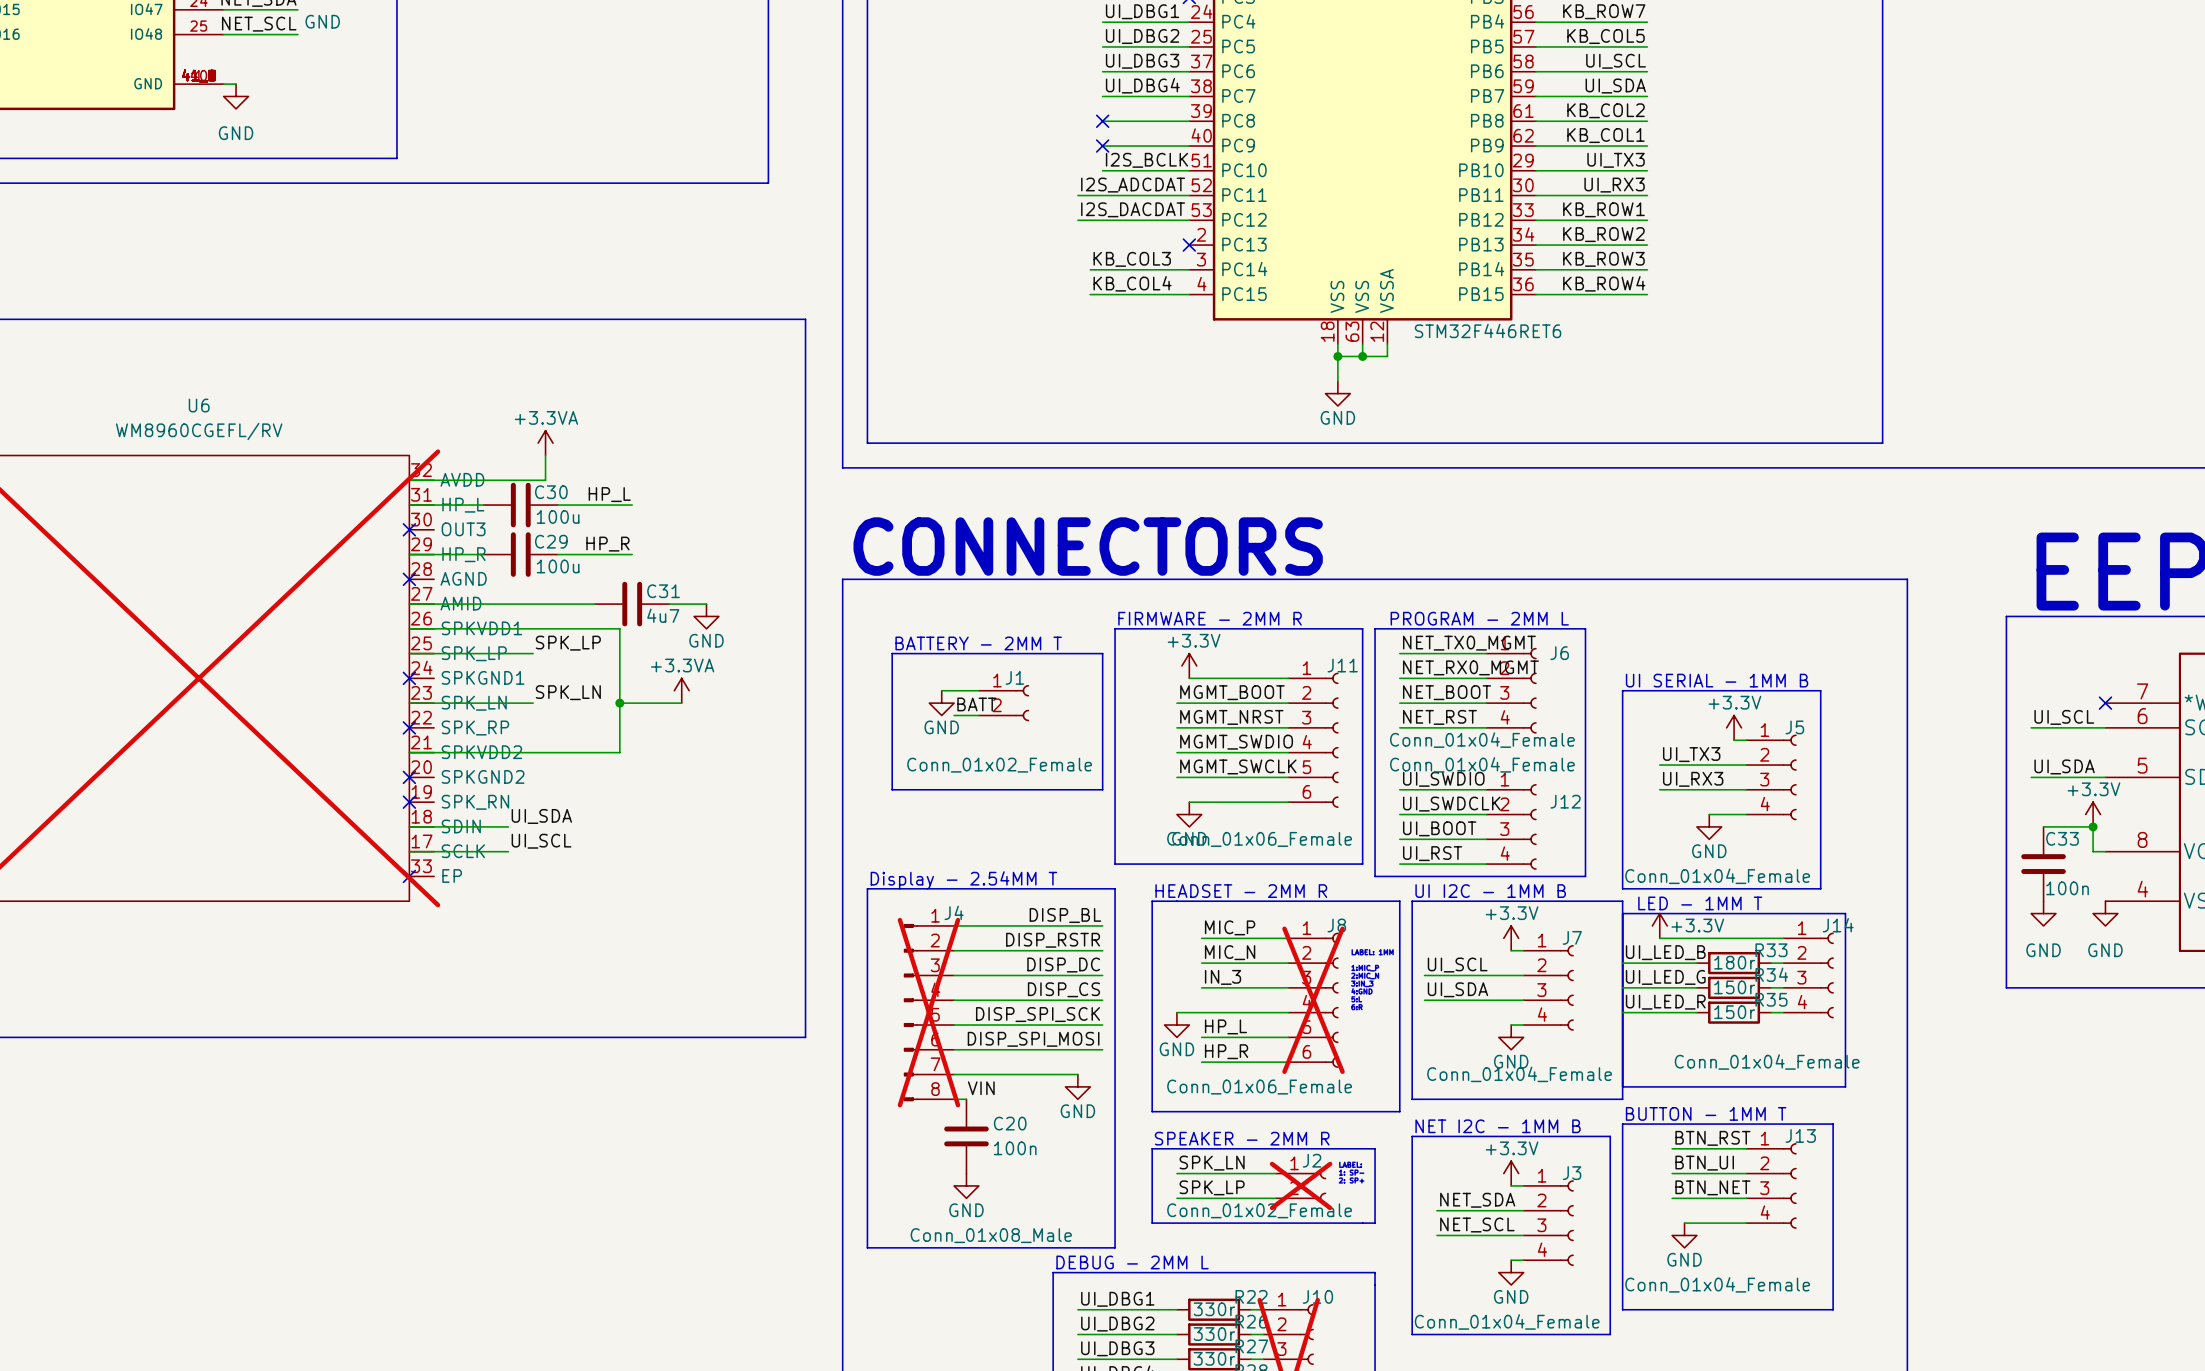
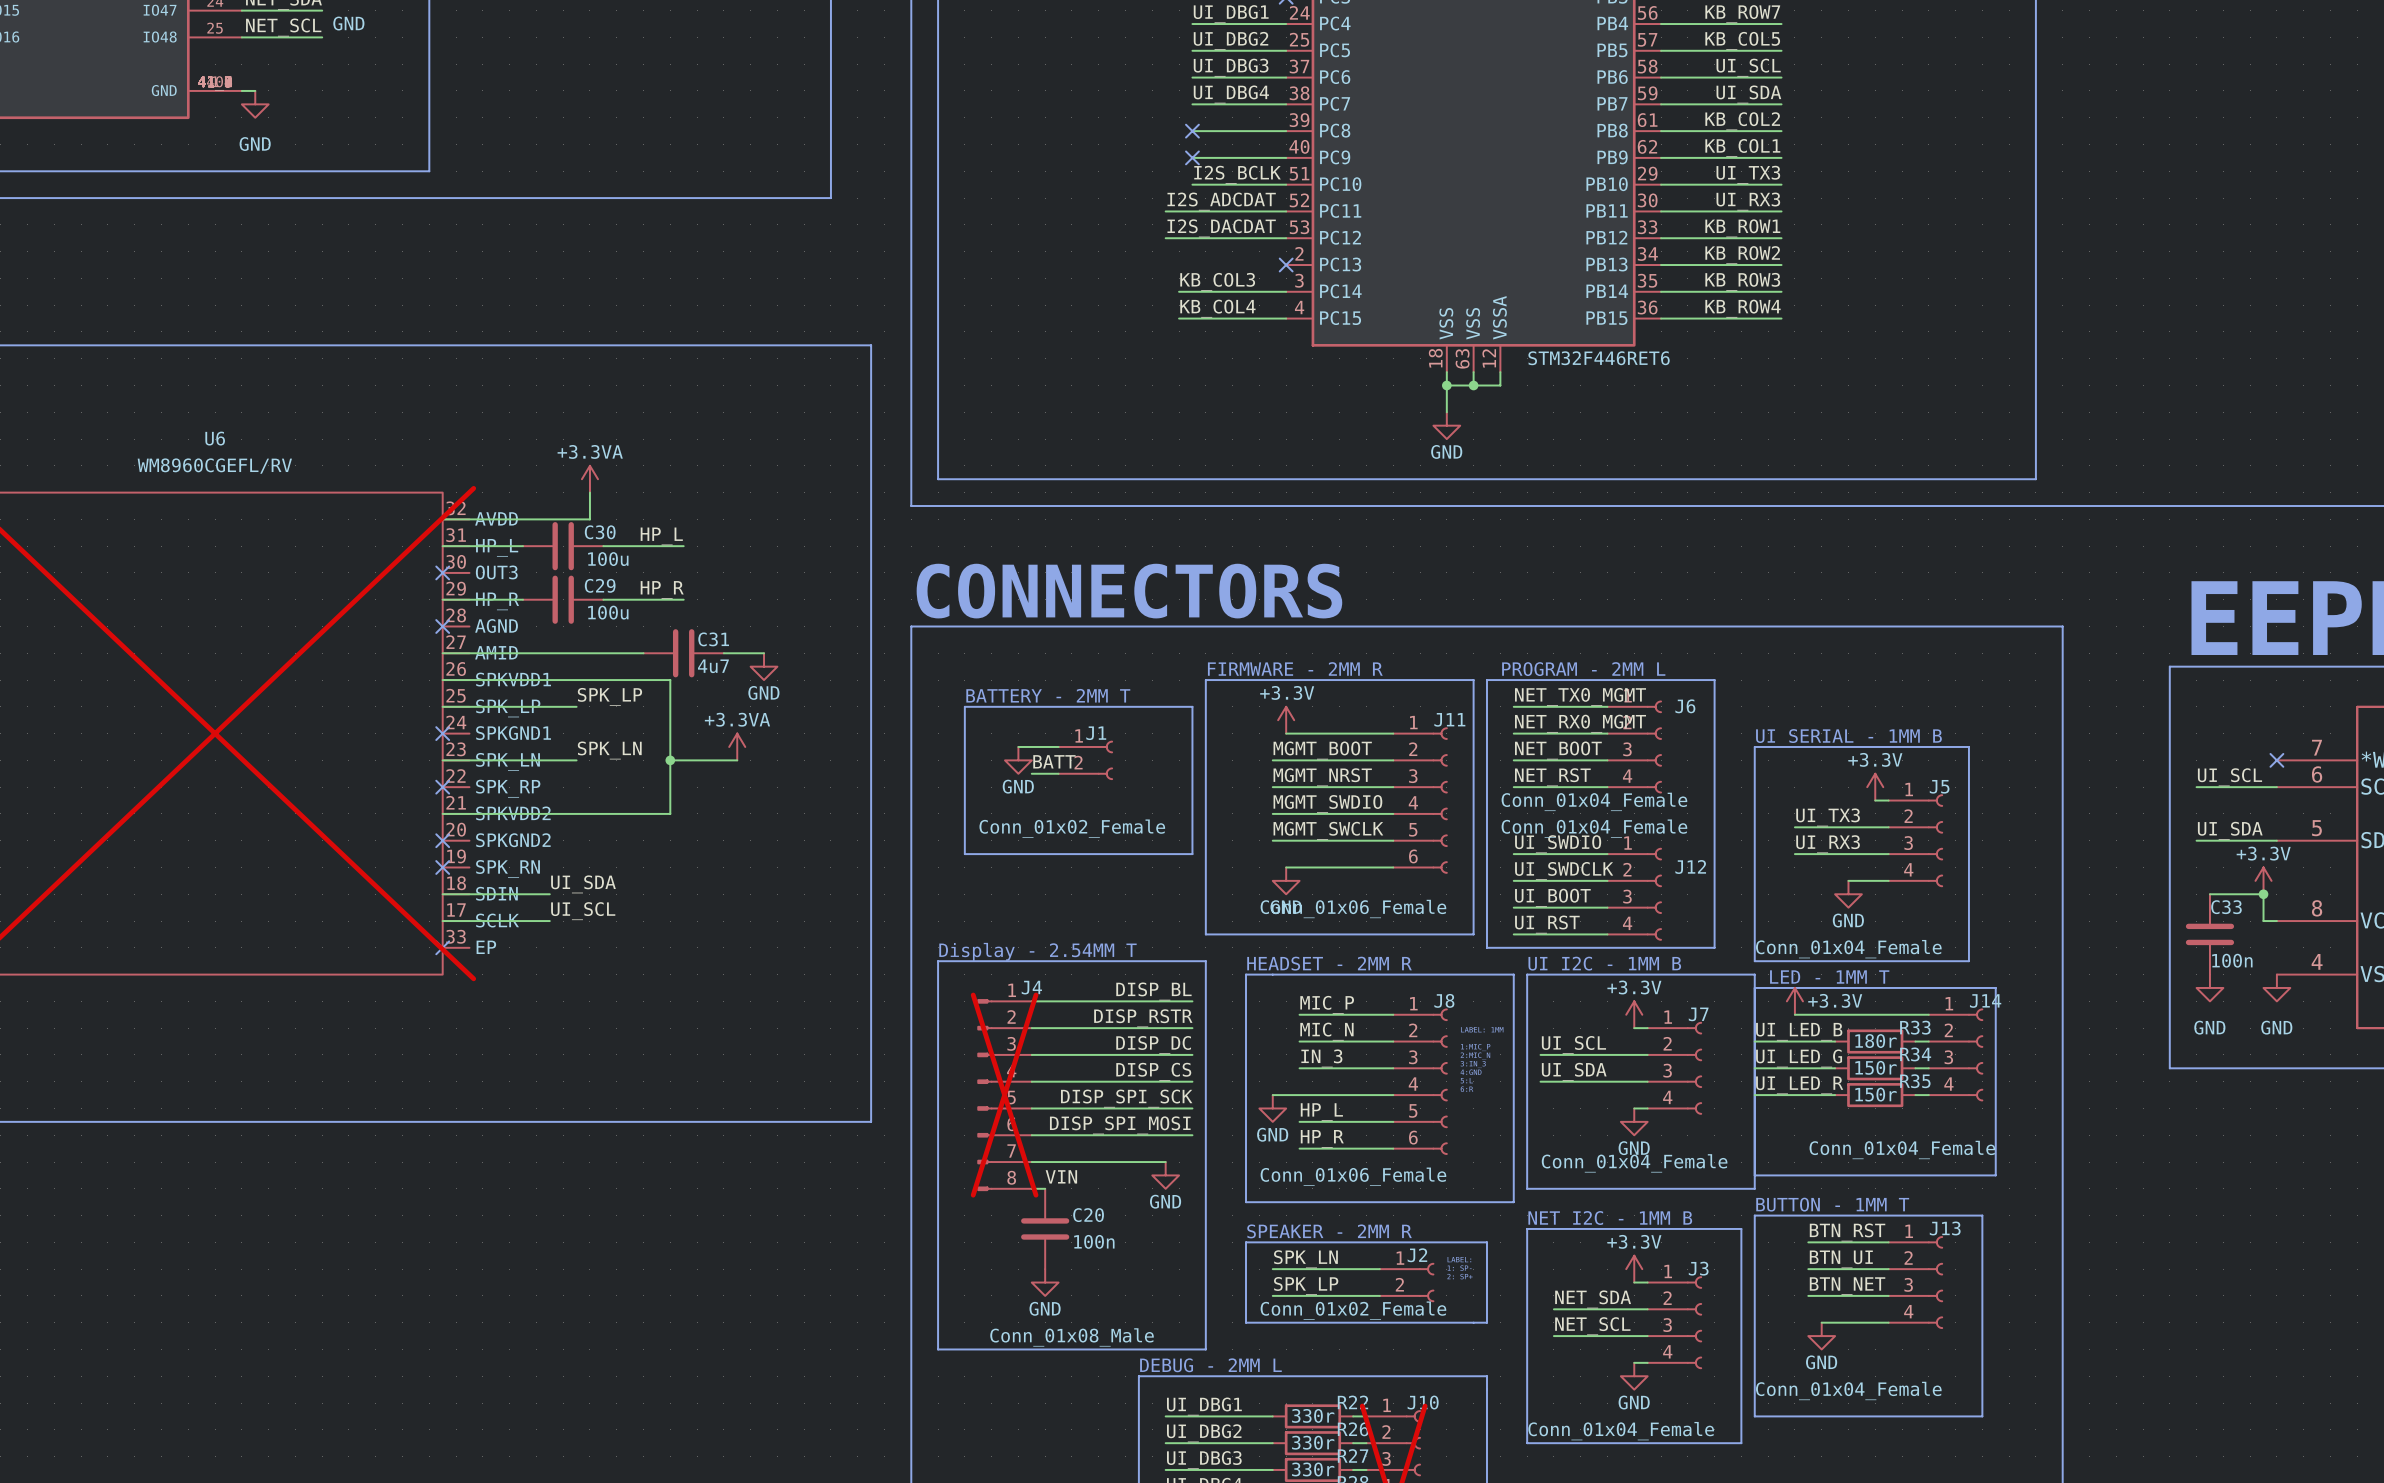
J8 do-not-place cross: (1313, 1000) -> none
J2 do-not-place cross: (1301, 1185) -> none

